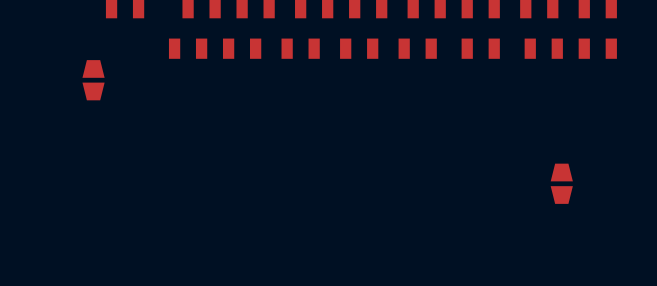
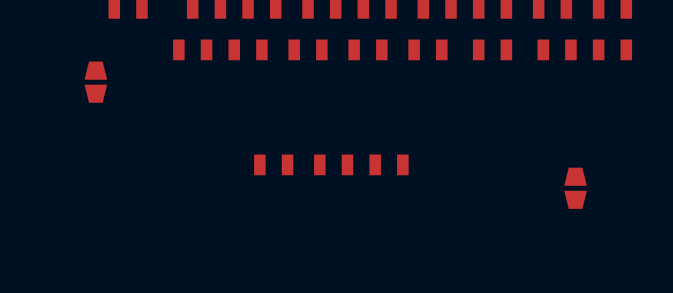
part: none -> (273, 164)
part: none -> (333, 164)
part: none -> (389, 164)

